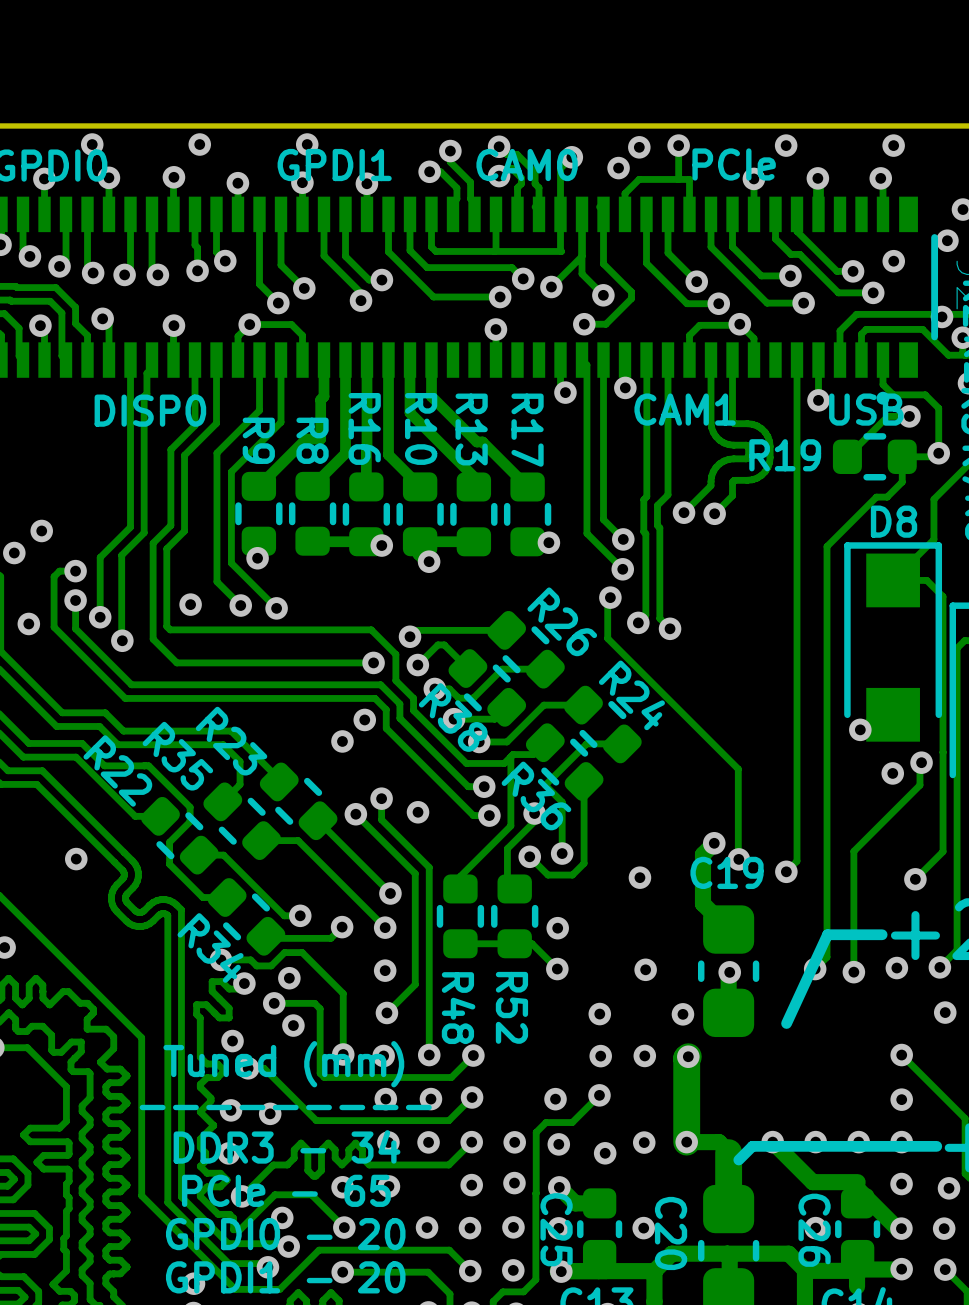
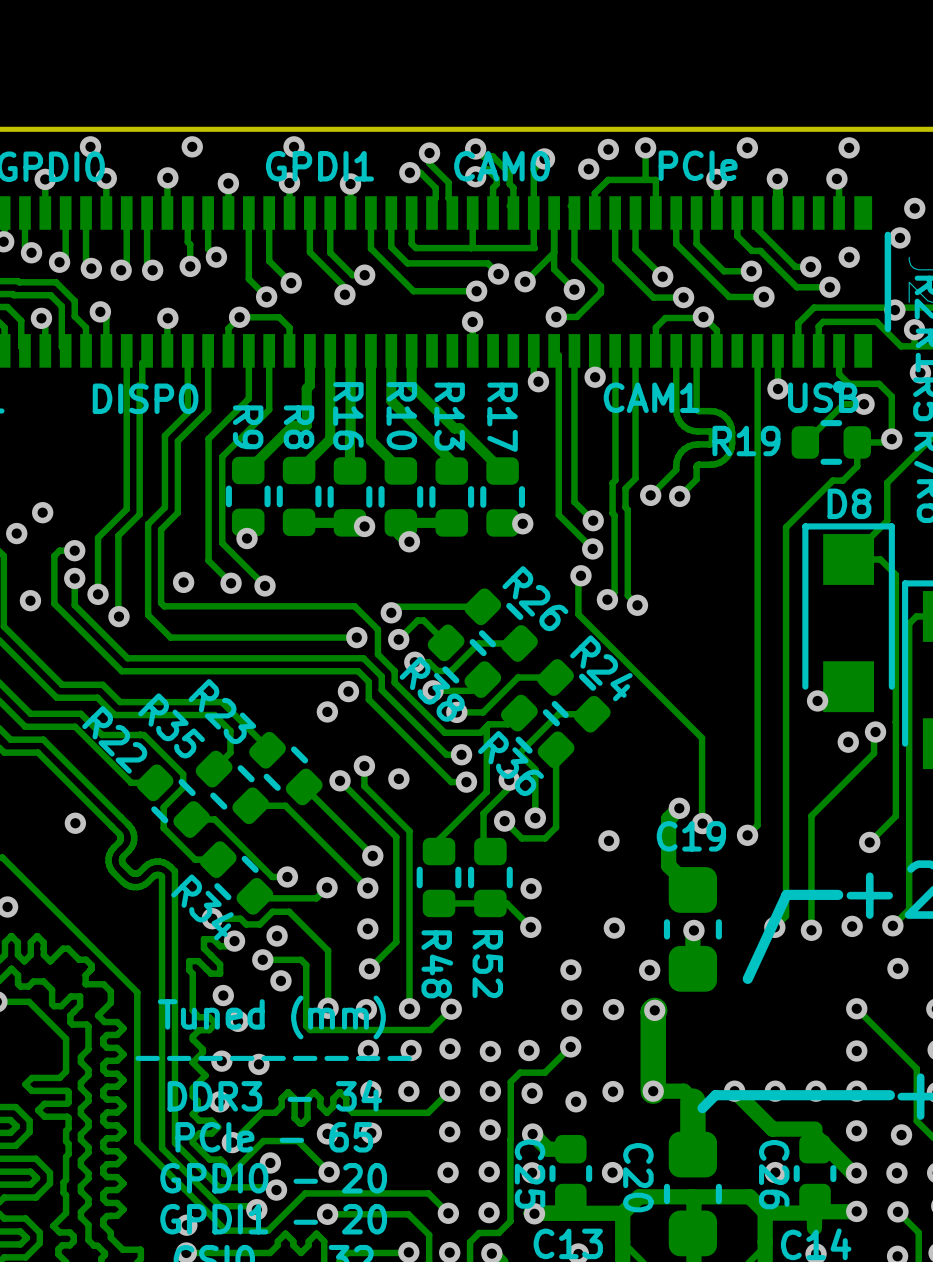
track: (248, 1068) (264, 1068) (316, 1120) (448, 1120) (472, 1097) -> none
via: none -> (490, 1051)
via: (427, 1227) -> none

